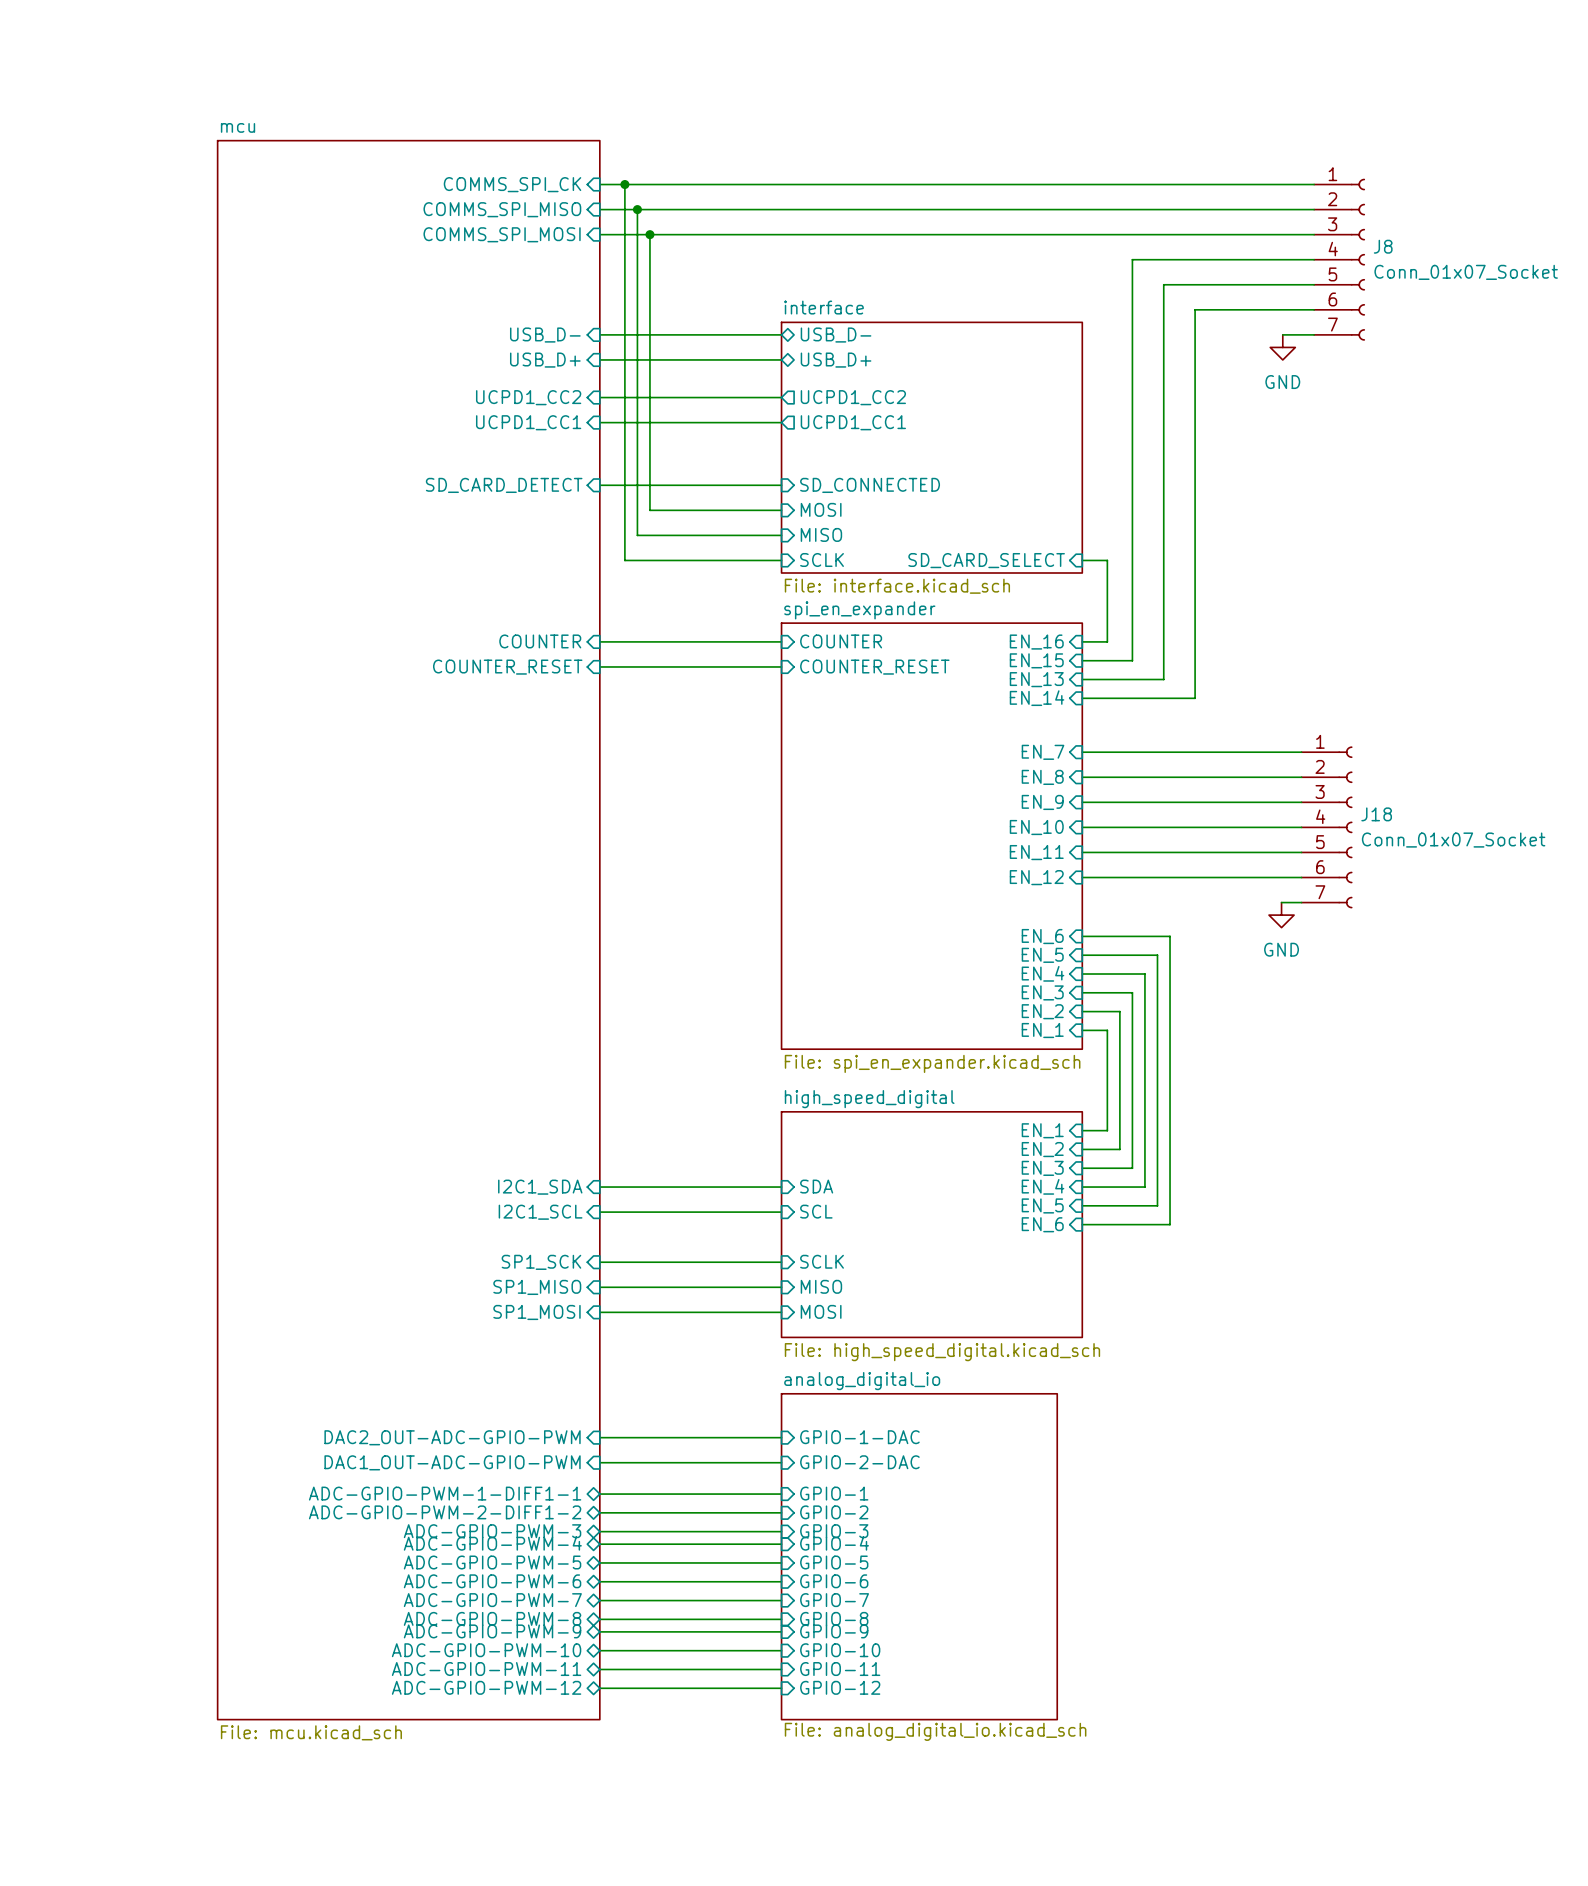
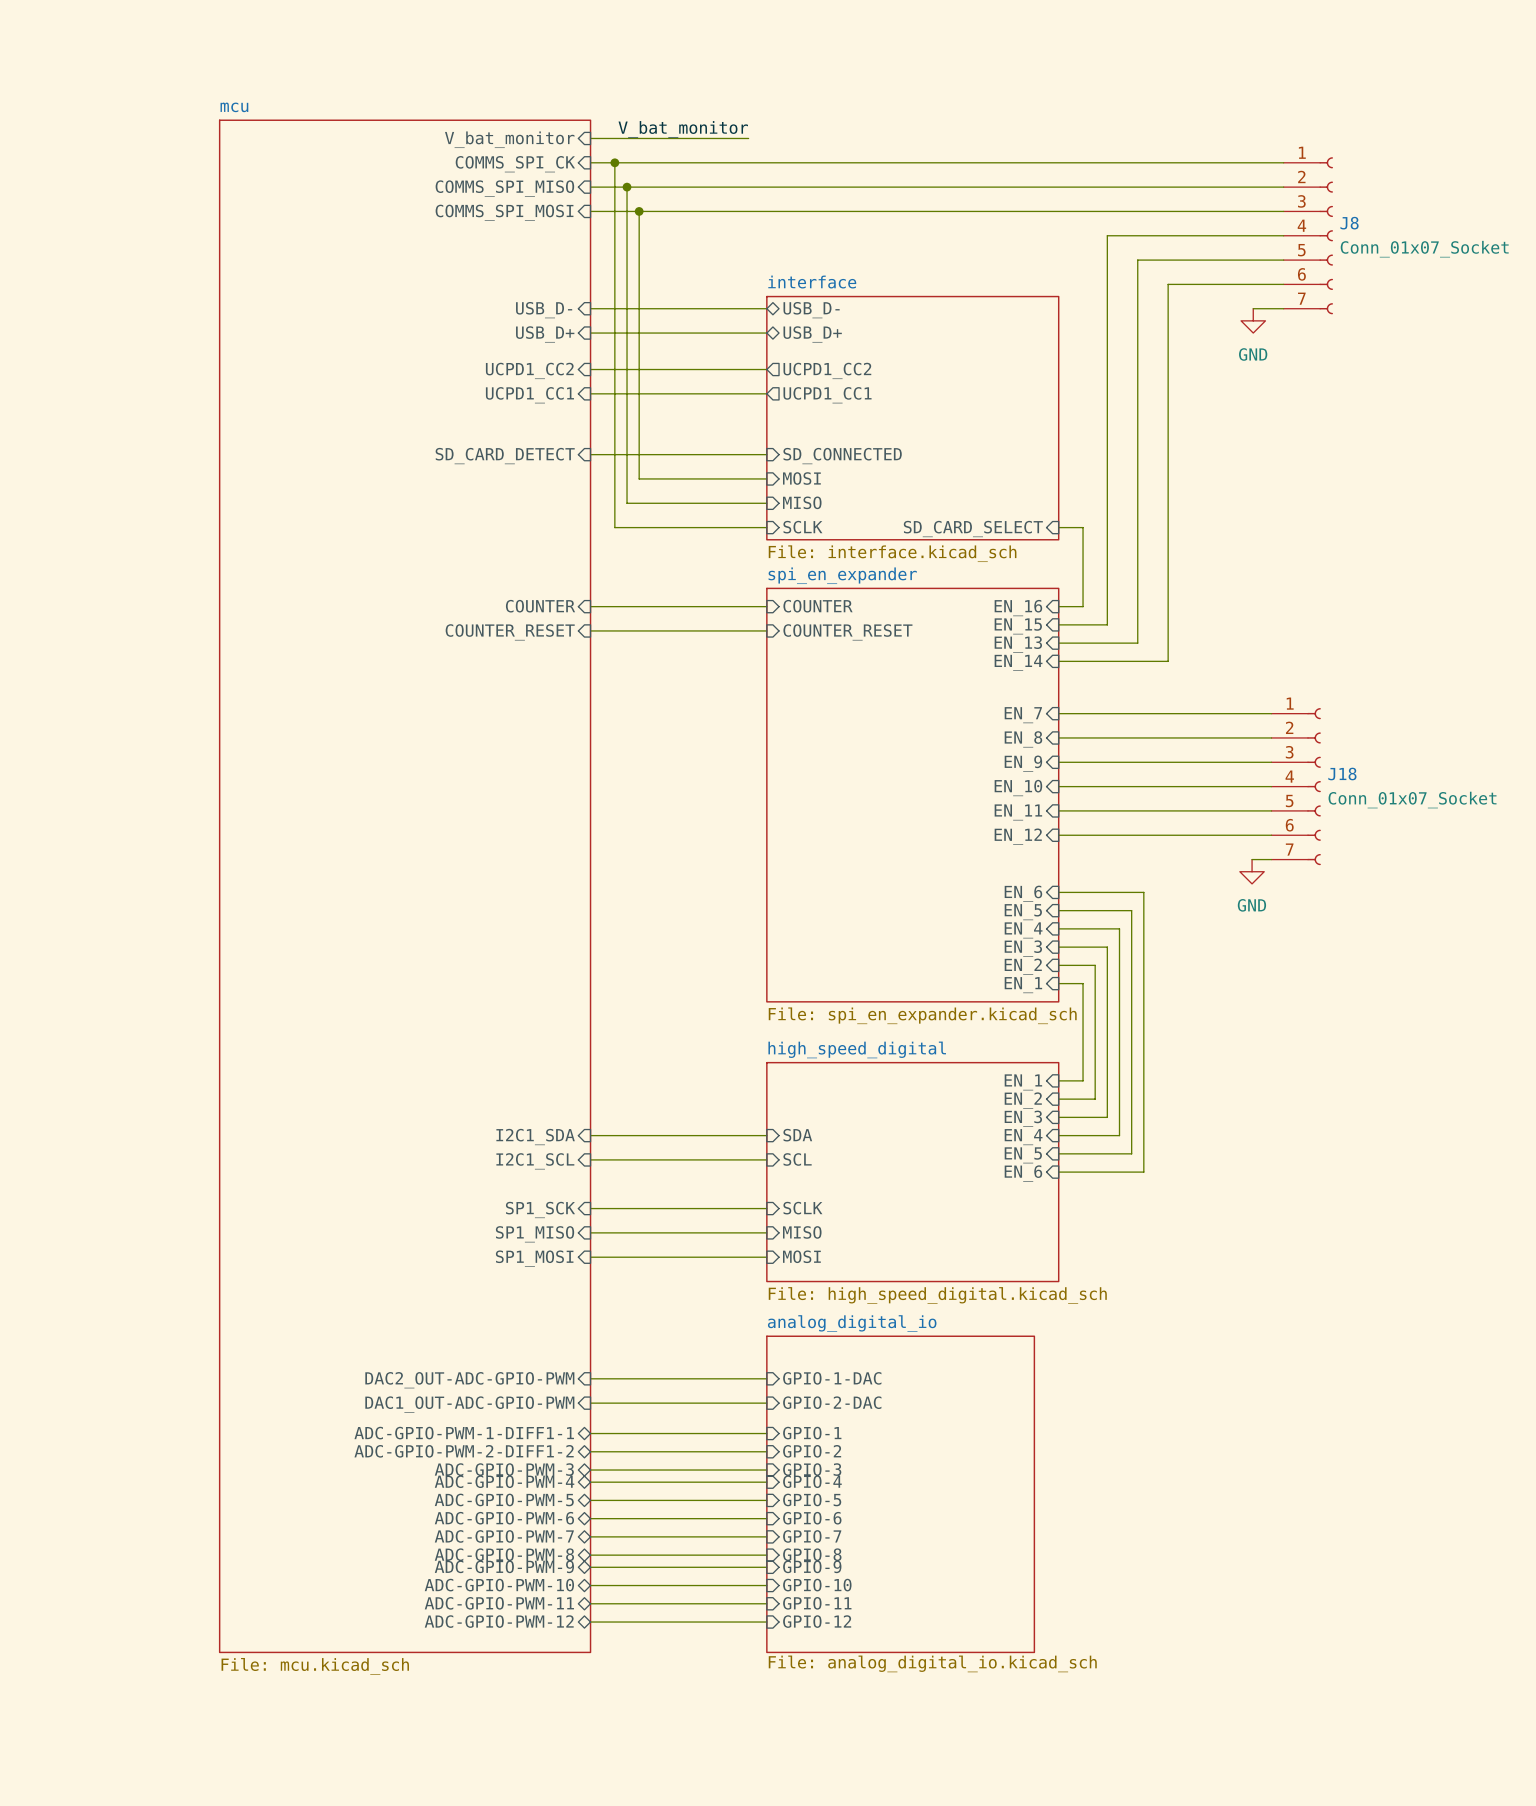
label: none -> V_bat_monitor (683, 129)
sheet pin: none -> V_bat_monitor (509, 139)
wire: none -> (590, 138) (748, 138)

